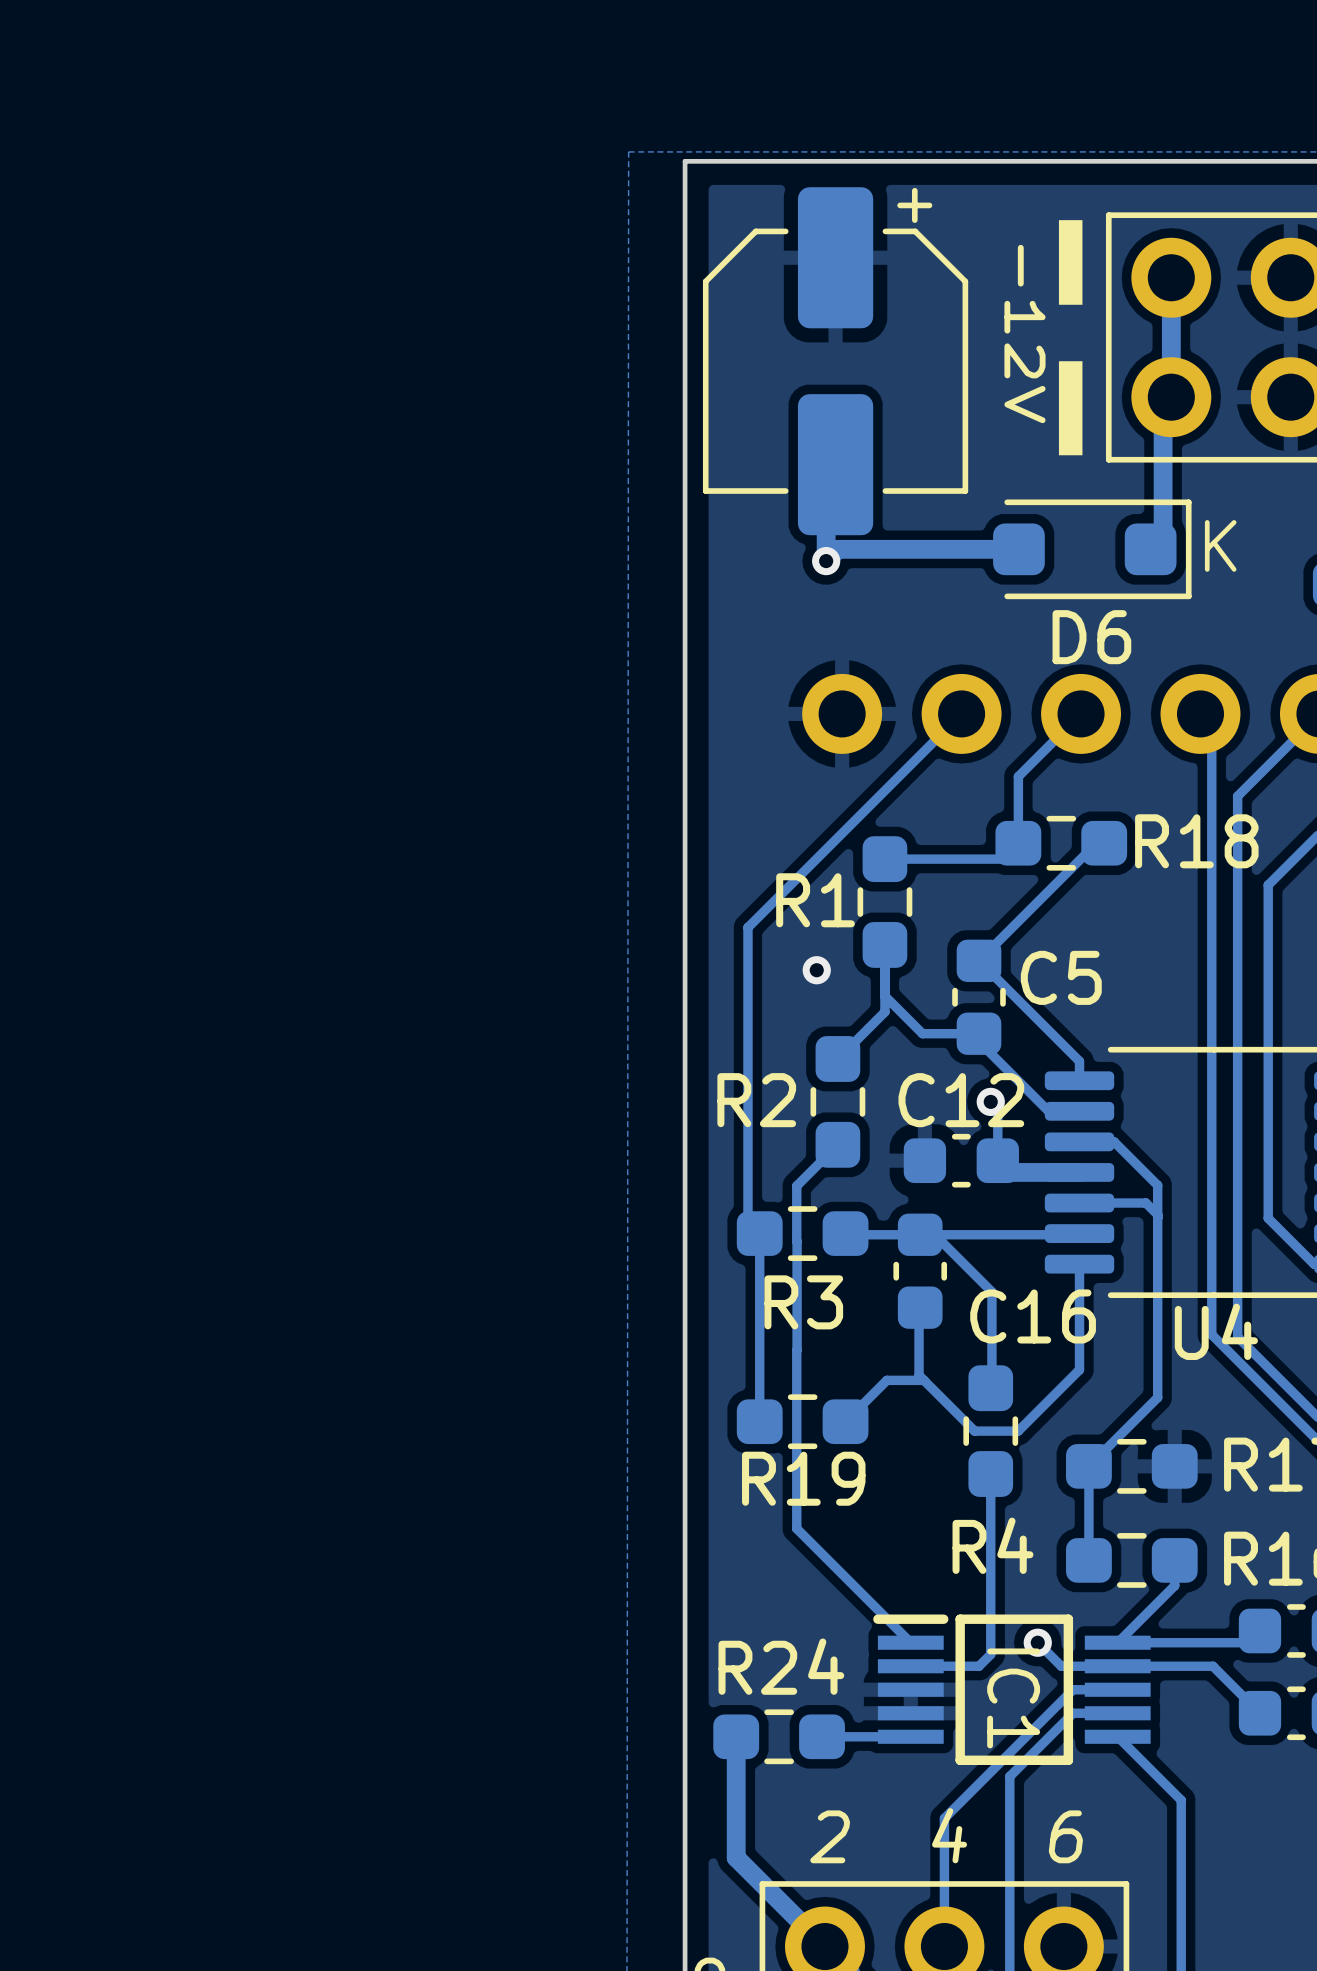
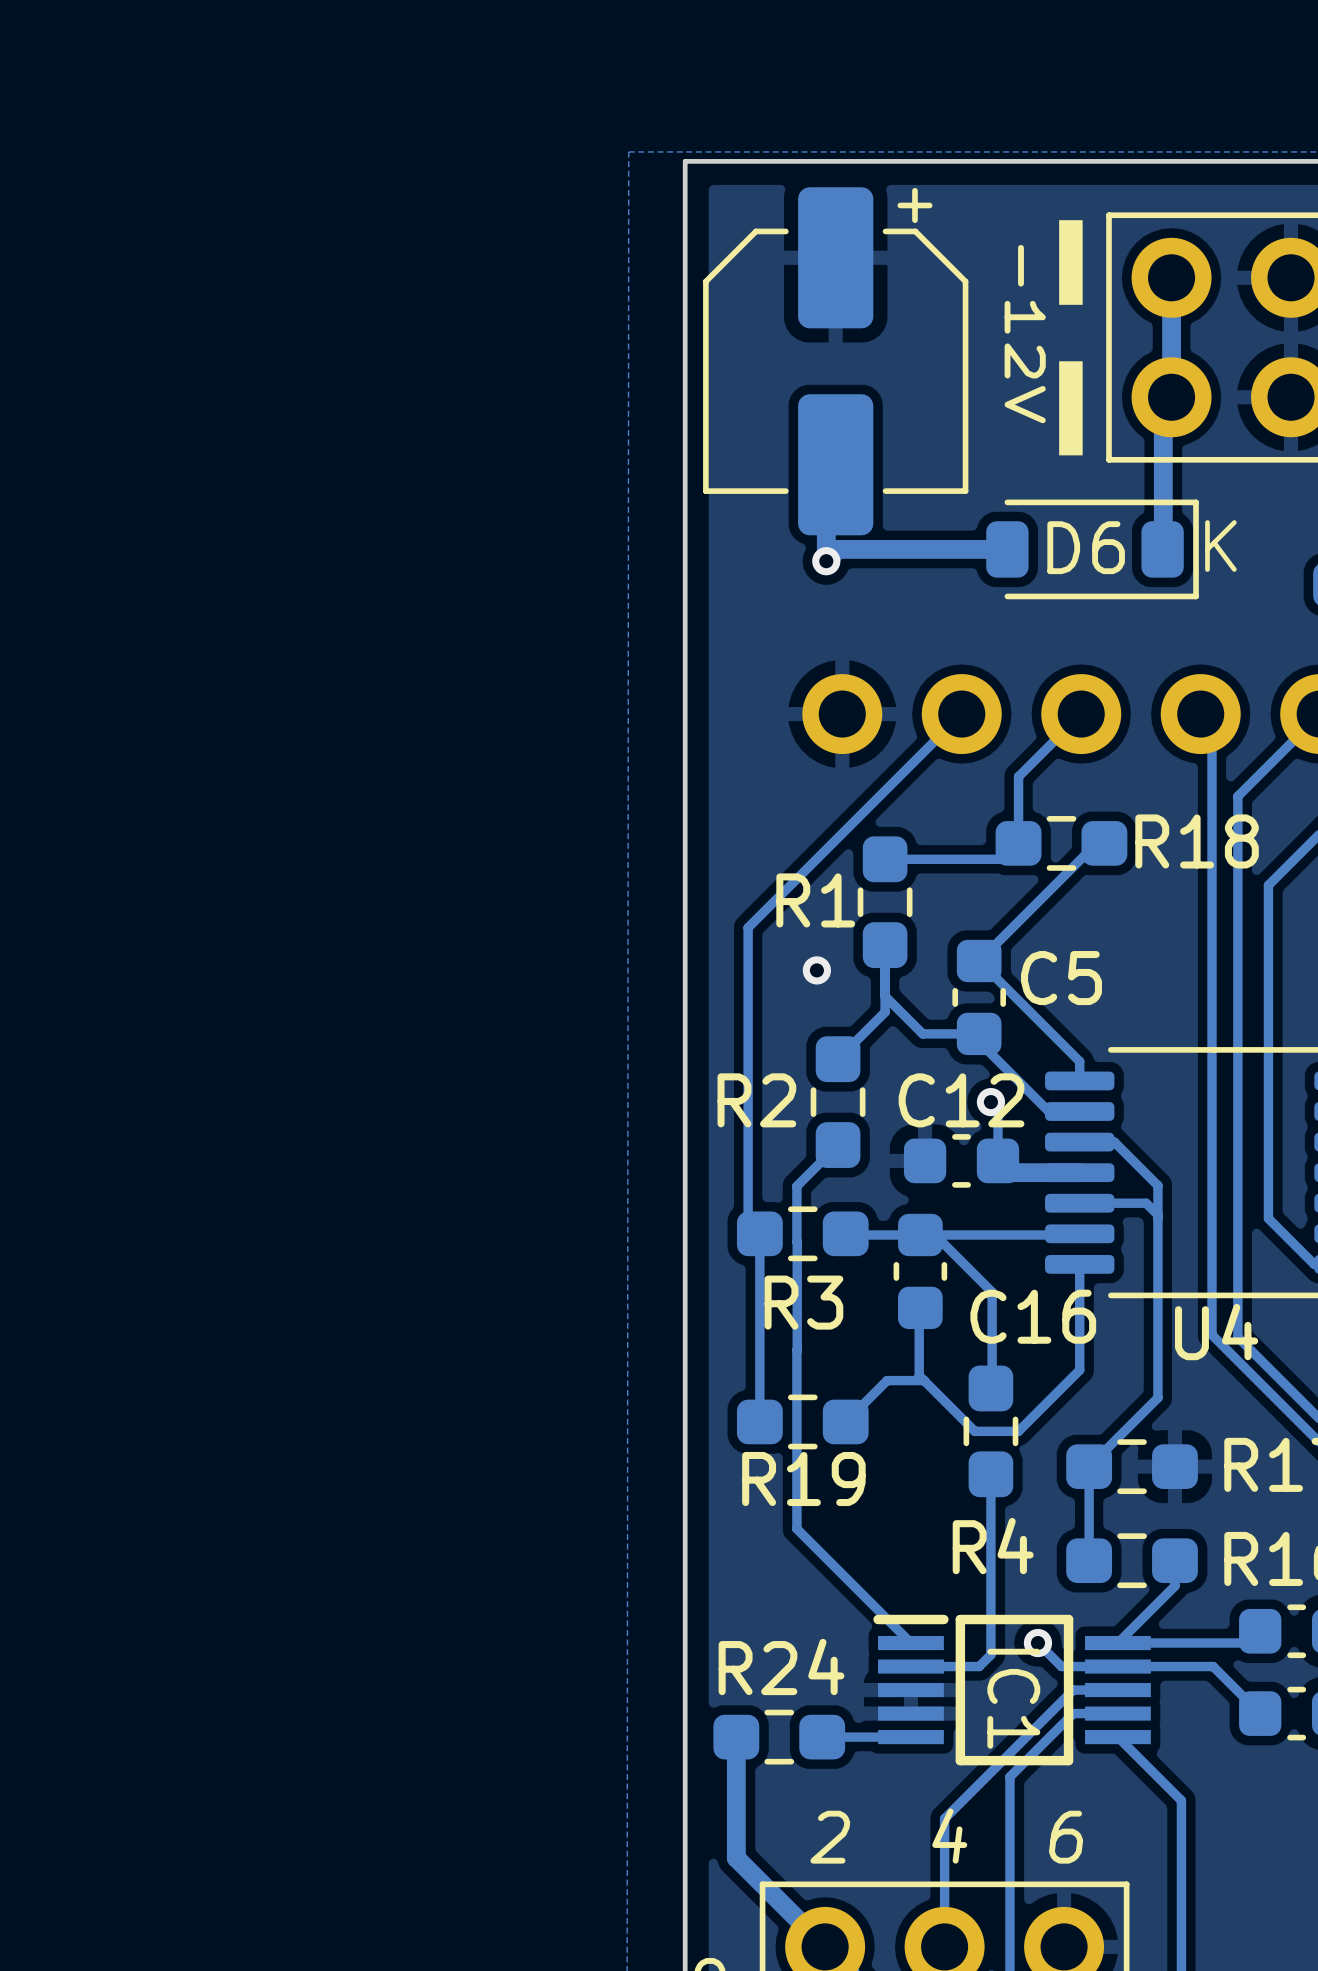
D6 footprint: [993, 499, 1192, 600] -> [986, 499, 1199, 600]
D6 name position: D6 (1091, 637) -> D6 (1086, 547)

